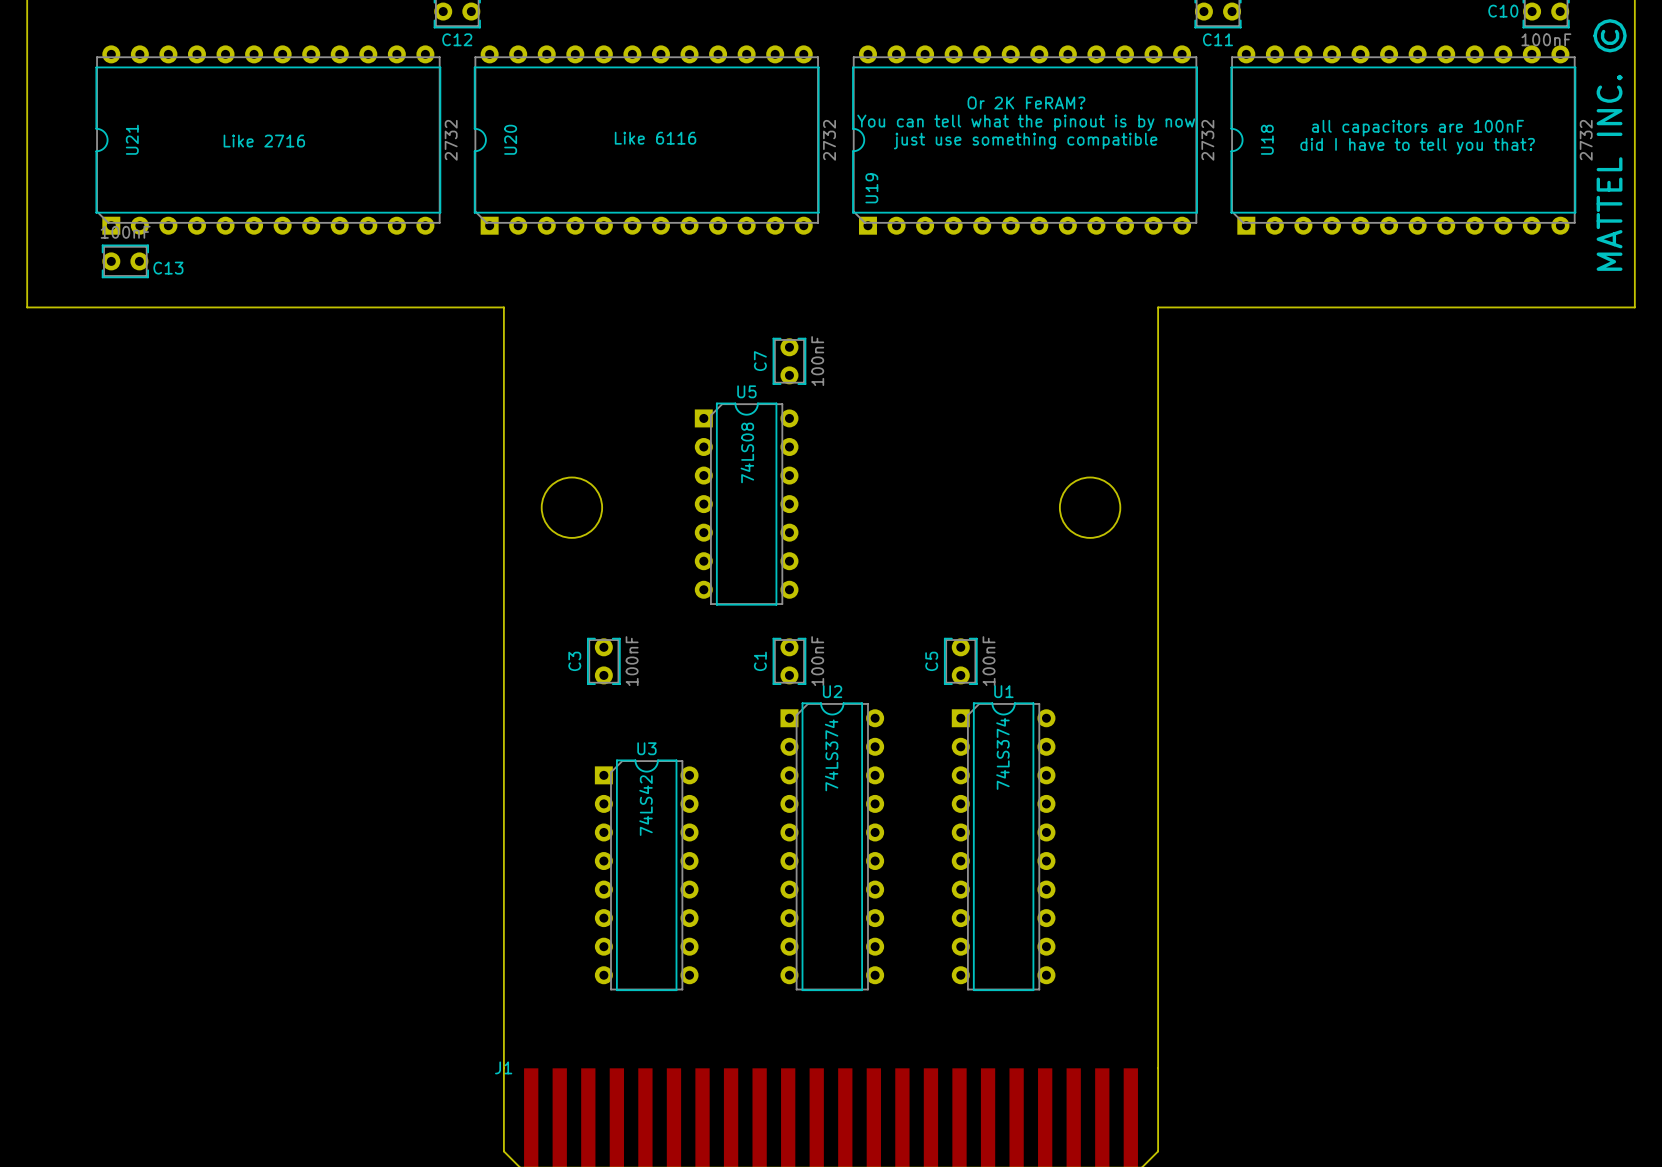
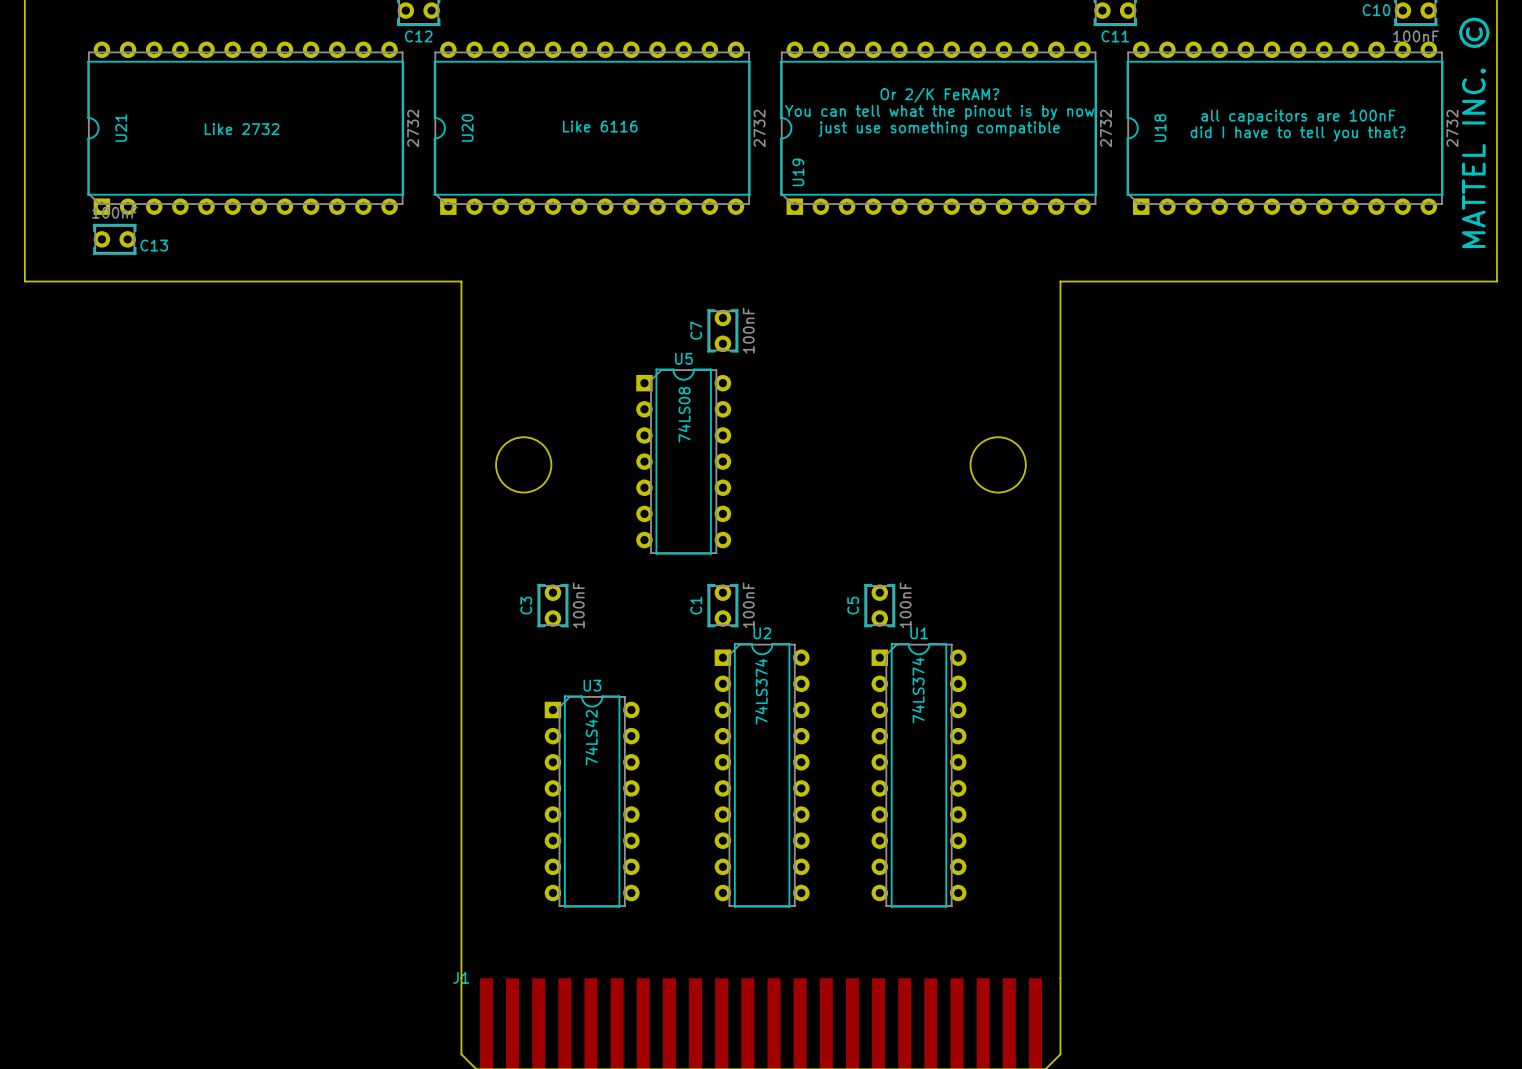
text: Or 2K FeRAM? (1026, 102) -> Or 2/K FeRAM? (939, 95)
text: Like 2716 (264, 141) -> Like 2732 (242, 129)

